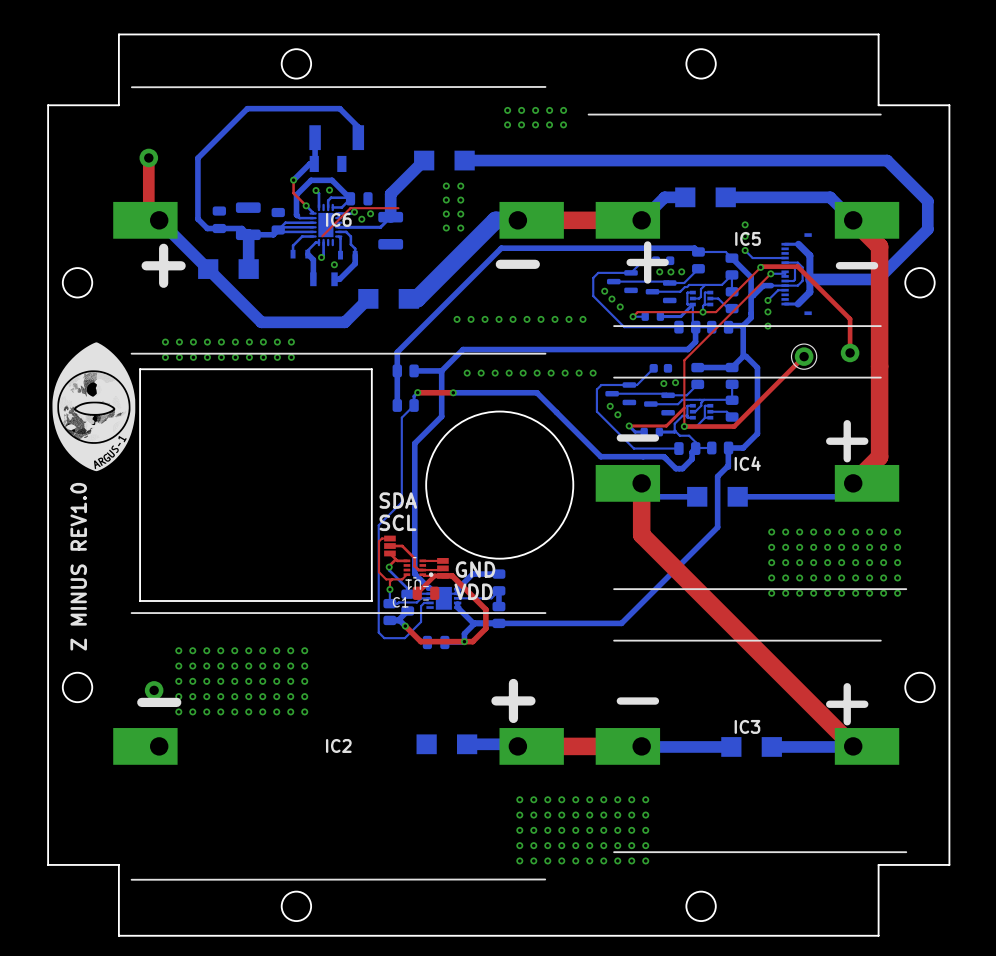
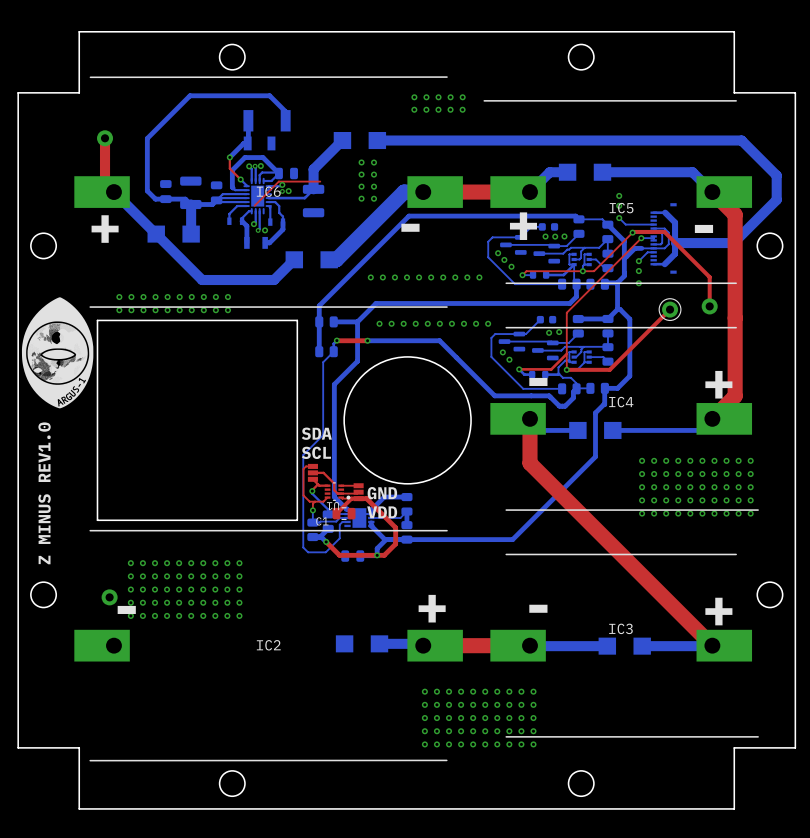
bottom track: none -> (255, 166) (255, 181)
via: none -> (255, 166)
via: (370, 213) -> none
via: none -> (282, 191)
bottom track: none -> (259, 211) (258, 230)
via: none -> (258, 230)

